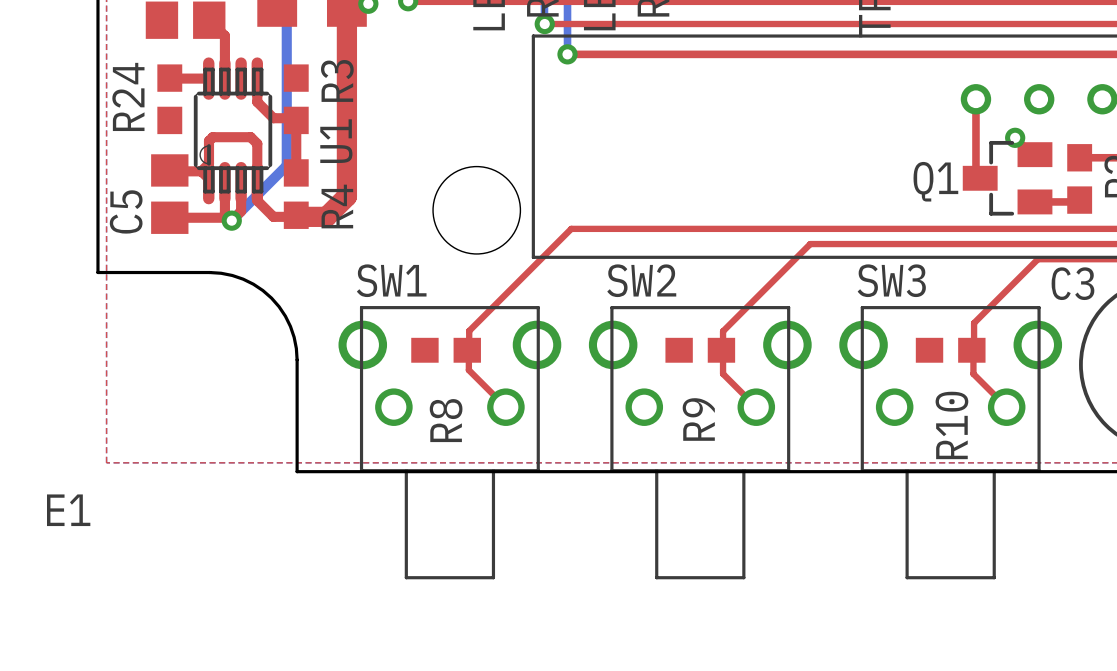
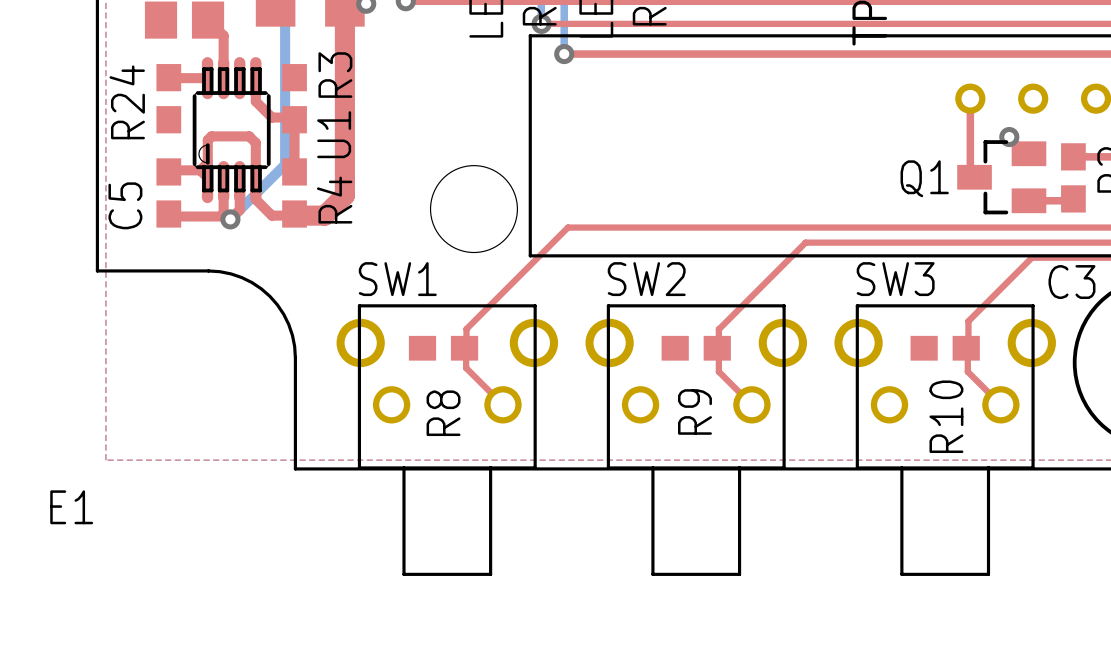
C5 footprint: [151, 154, 189, 234] -> [156, 158, 182, 228]

